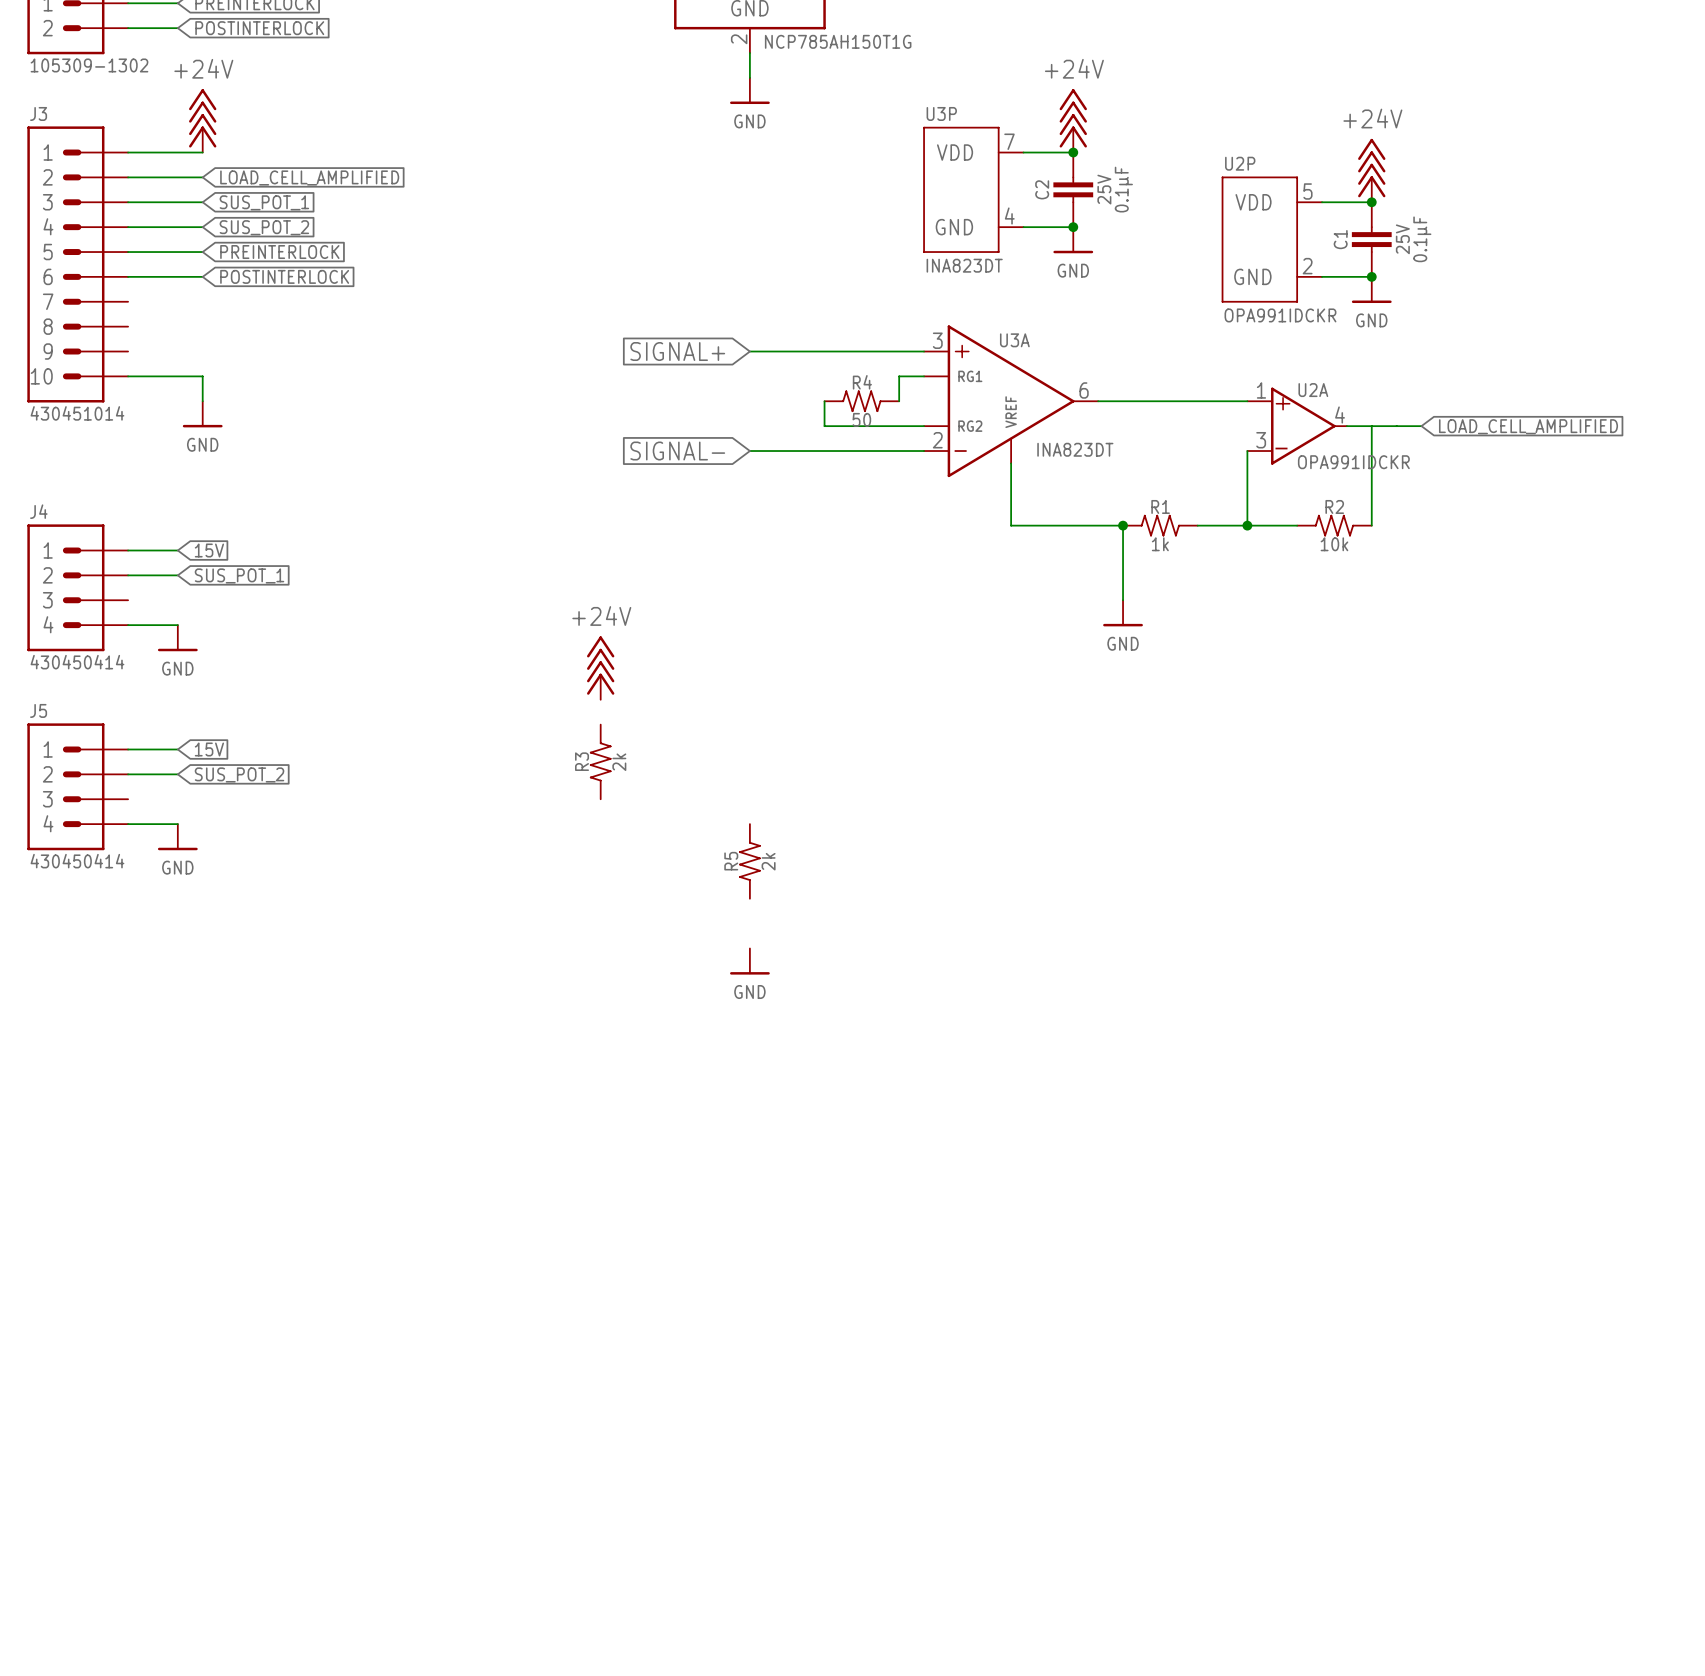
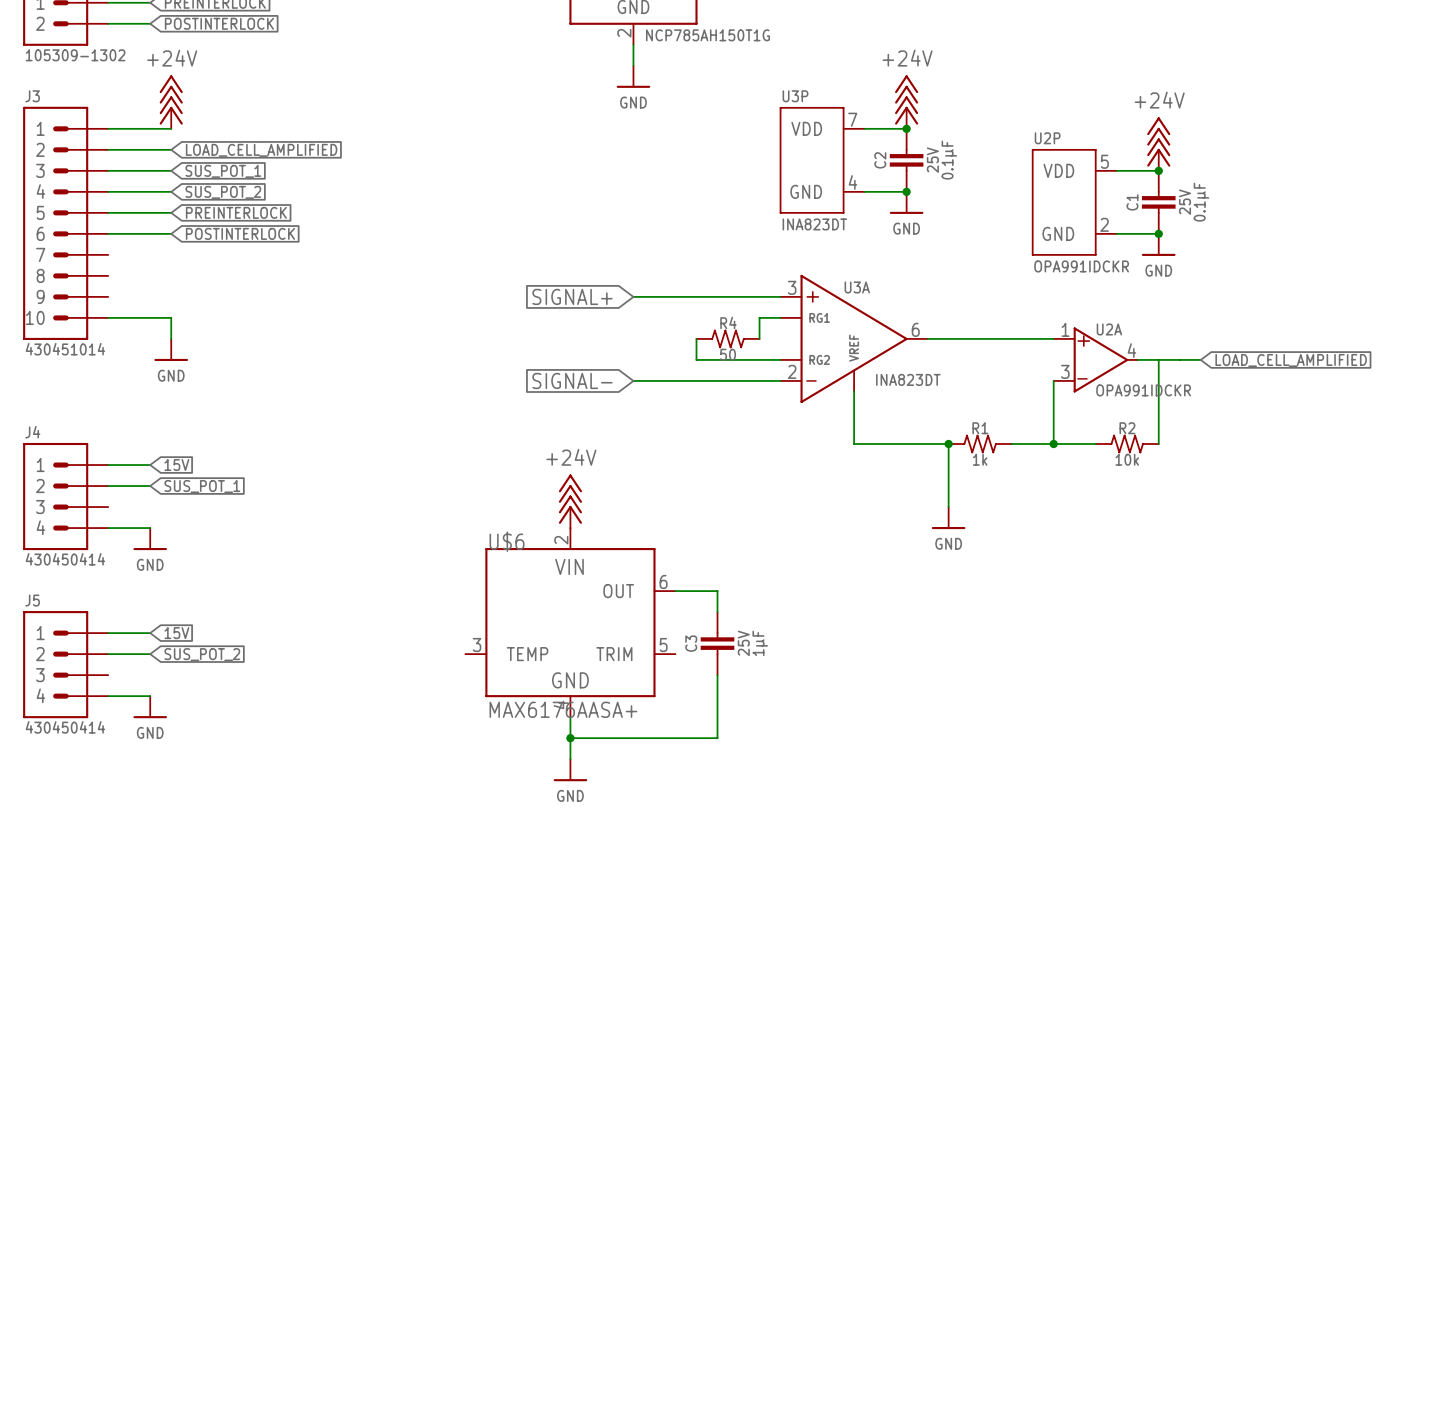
power symbol position: +24V (600, 668) -> +24V (570, 501)
wire: none -> (675, 591) (717, 591) (717, 612)
U$6: none -> (570, 622)
R3: (600, 761) -> none
C3: none -> (717, 643)
wire: none -> (717, 675) (717, 738) (570, 738)
wire: none -> (570, 717) (570, 759)
R5: (749, 861) -> none
junction: none -> (570, 738)
power symbol position: GND (749, 961) -> GND (570, 770)

